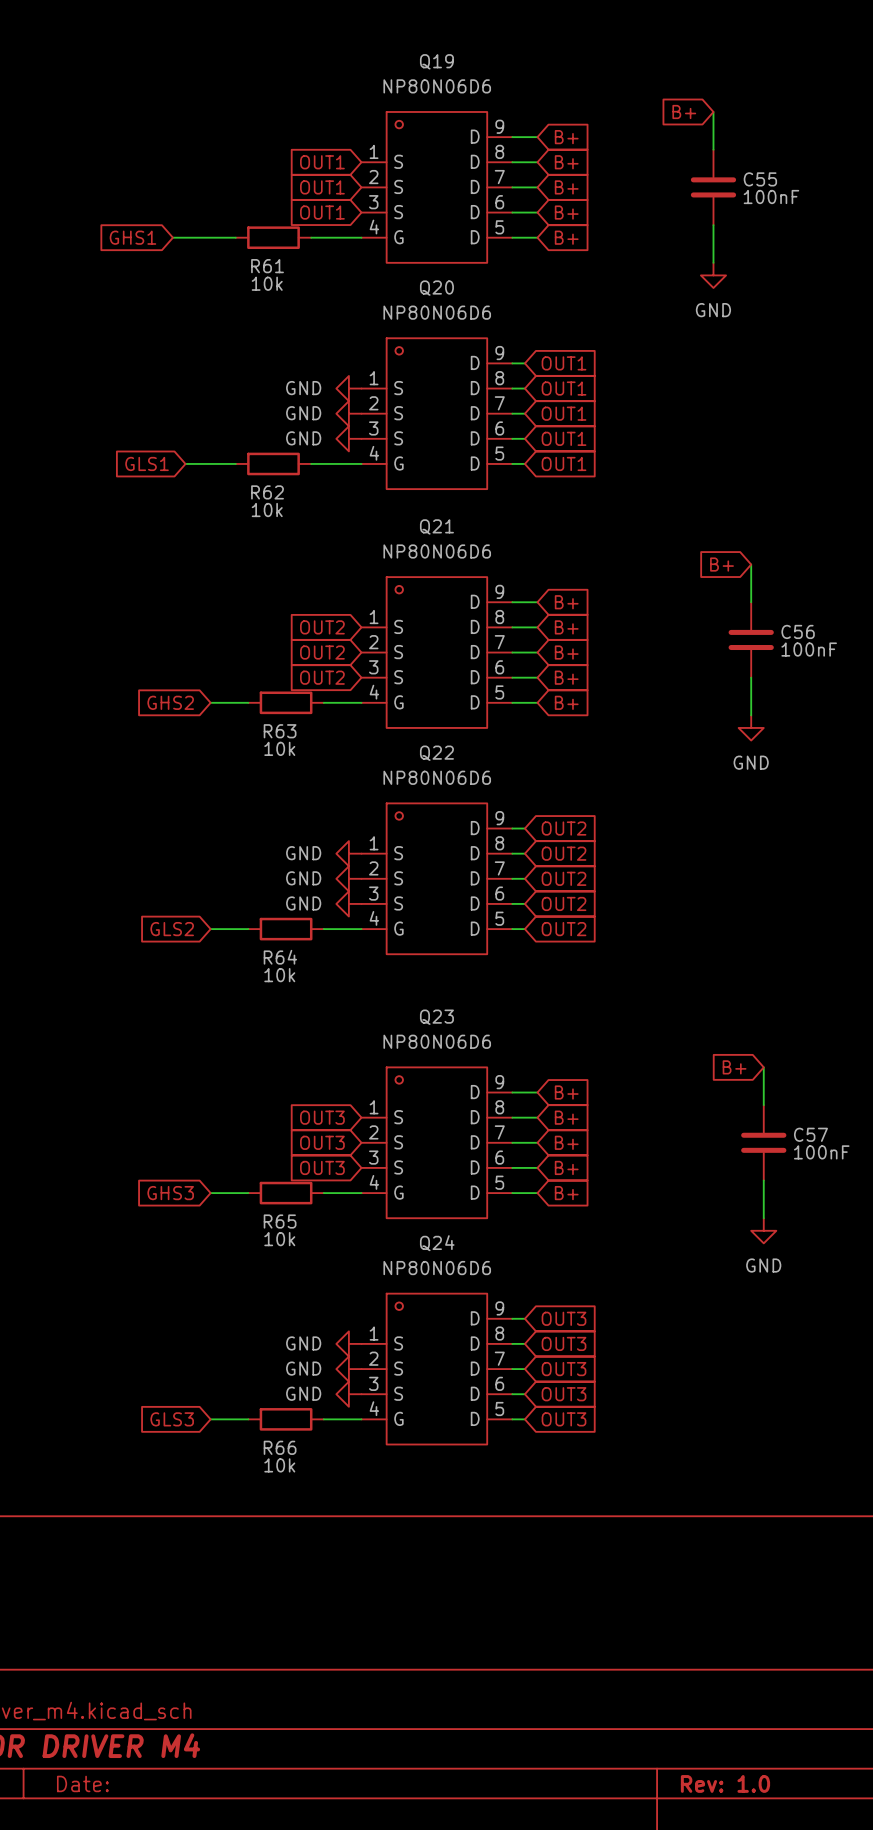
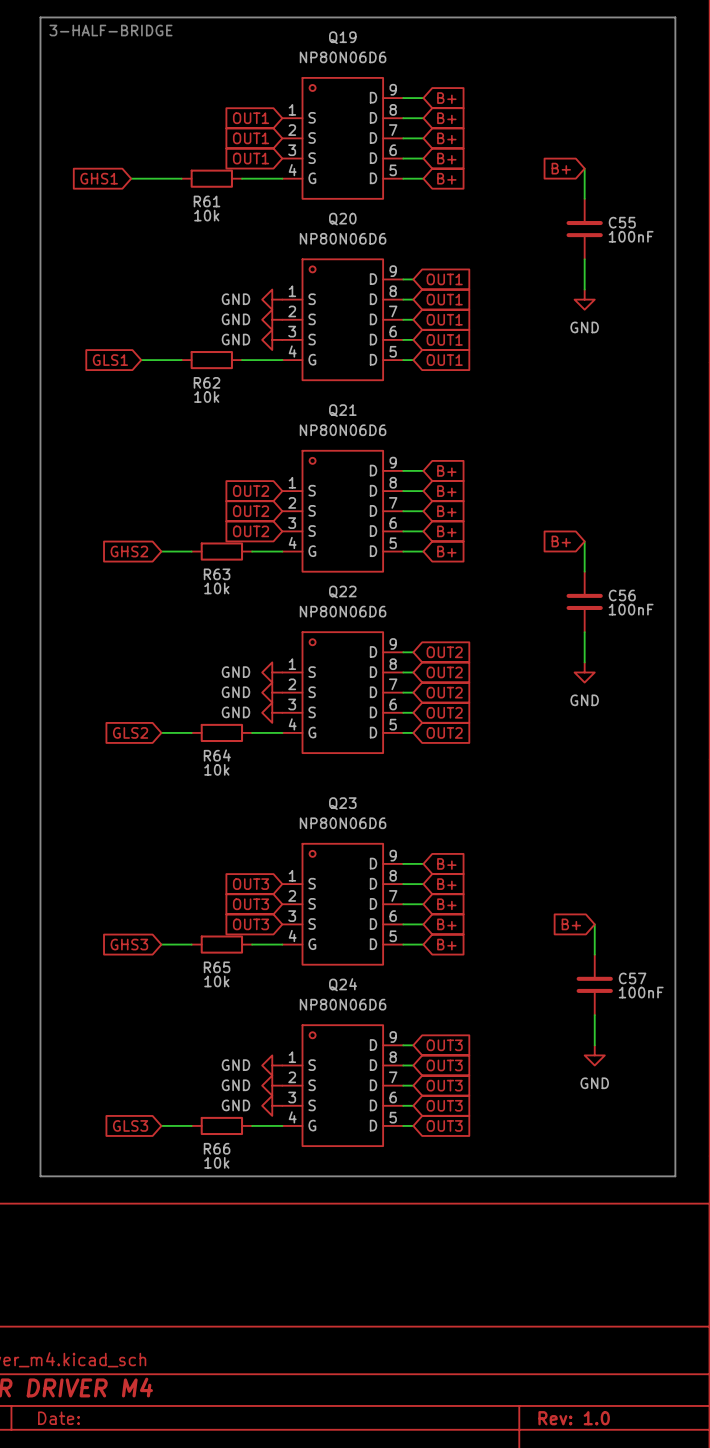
line: none -> (40, 17) (675, 17) (675, 1176) (40, 1176) (40, 17)
text: none -> 3-HALF-BRIDGE (110, 30)
global label position: B+ (684, 111) -> B+ (561, 168)
wire: (713, 111) (713, 149) -> (584, 168) (584, 198)
C55 position: (713, 187) -> (584, 229)
wire: (713, 225) (713, 262) -> (584, 259) (584, 289)
power symbol position: GND (713, 275) -> GND (584, 299)
global label position: B+ (721, 564) -> B+ (561, 541)
wire: (751, 564) (751, 602) -> (584, 541) (584, 571)
C56 position: (751, 639) -> (584, 601)
wire: (751, 677) (751, 715) -> (584, 632) (584, 662)
power symbol position: GND (751, 727) -> GND (584, 672)
global label position: B+ (734, 1067) -> B+ (571, 924)
wire: (763, 1067) (763, 1105) -> (594, 924) (594, 954)
C57 position: (763, 1142) -> (594, 984)
wire: (763, 1180) (763, 1218) -> (594, 1015) (594, 1045)
power symbol position: GND (763, 1230) -> GND (594, 1055)

